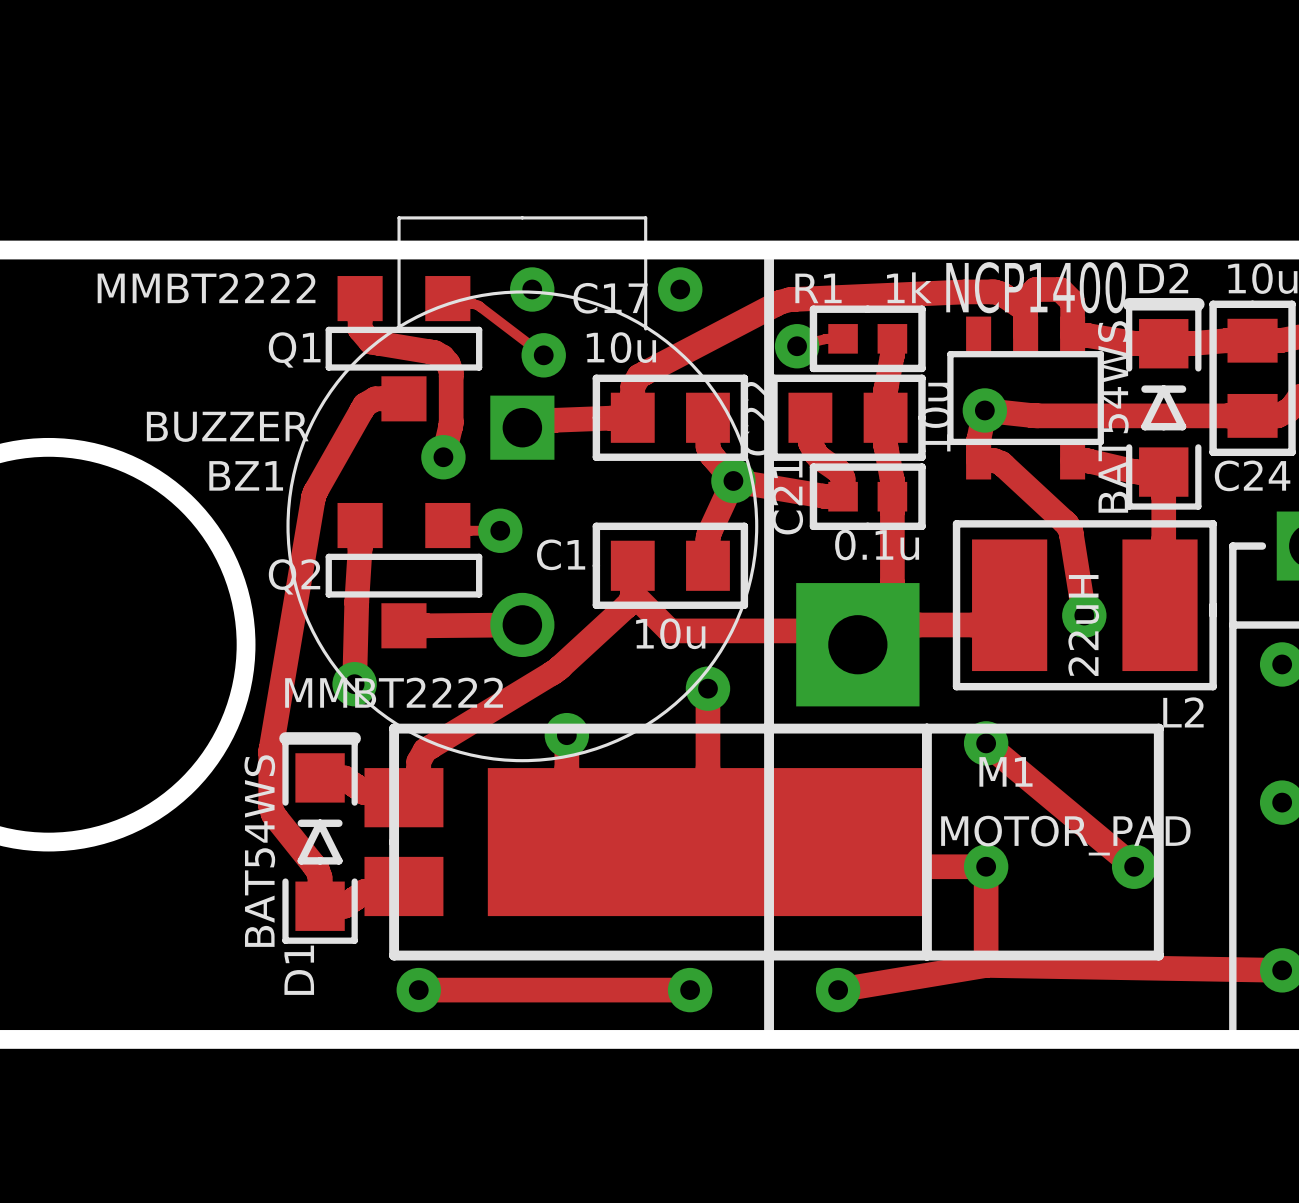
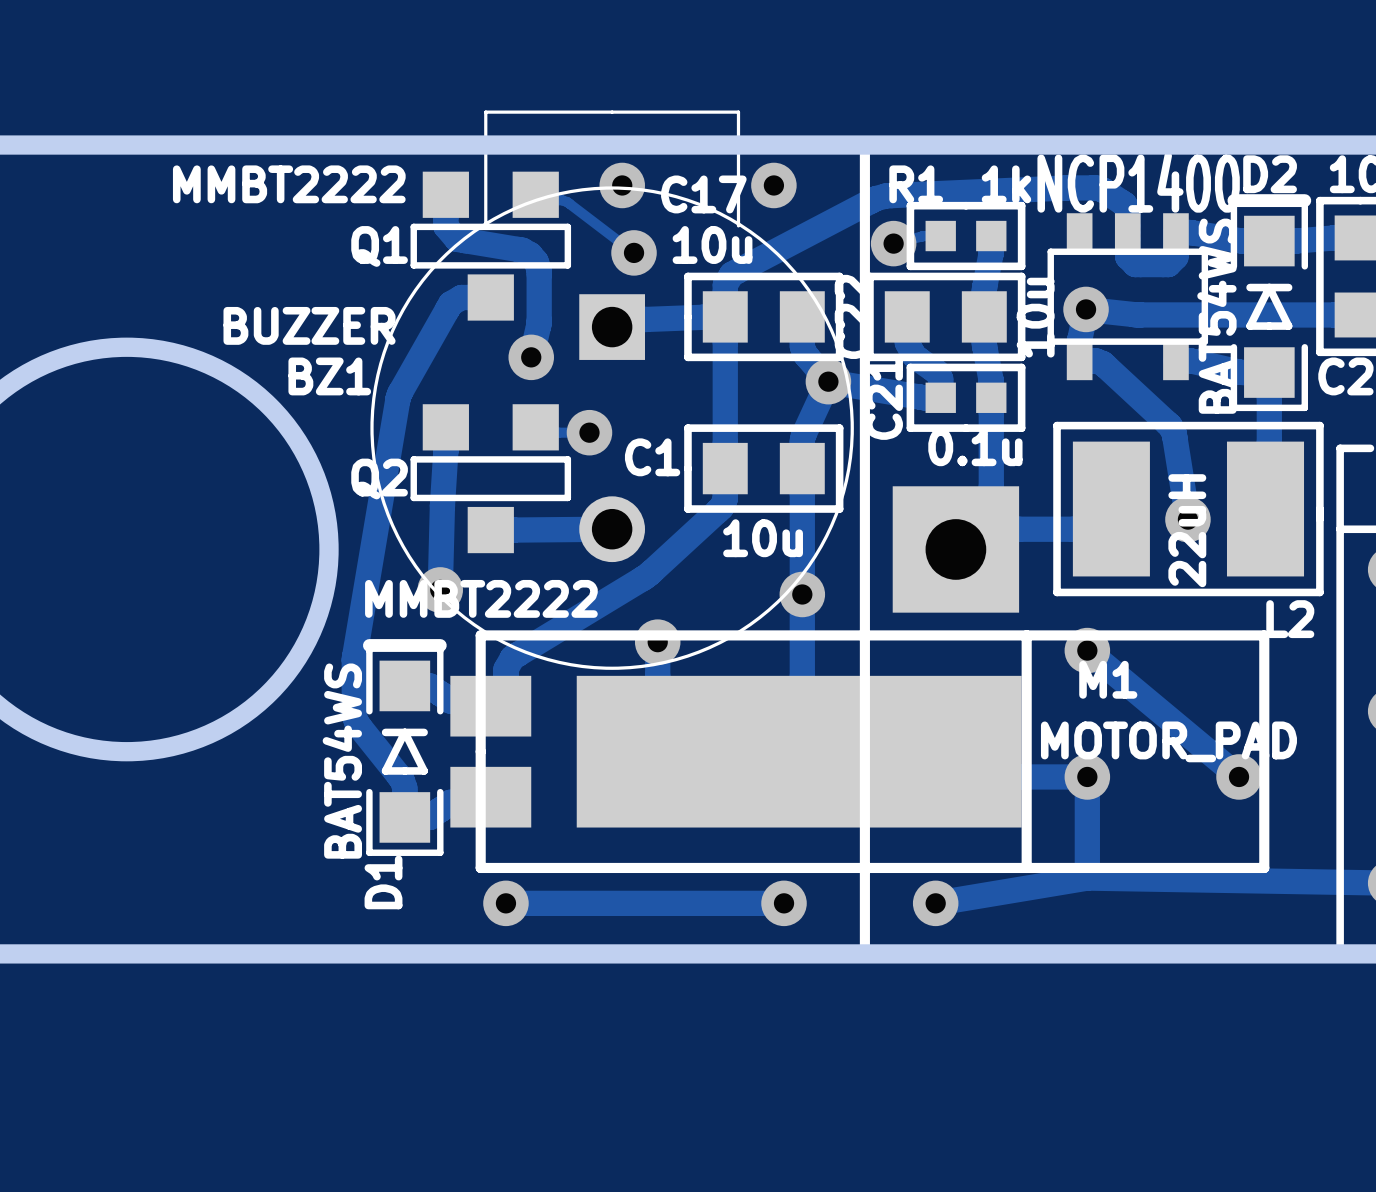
track: (1025, 313) (1025, 299) (1035, 289) (1060, 289) (1072, 301) (1072, 335) -> (1127, 232) (1127, 257) (1135, 264) (1168, 264) (1175, 257) (1175, 232)
track: none -> (725, 316) (725, 468)
track: none -> (802, 468) (802, 594)
track: (632, 590) (632, 593) (669, 630) (844, 630) (857, 644) -> none

